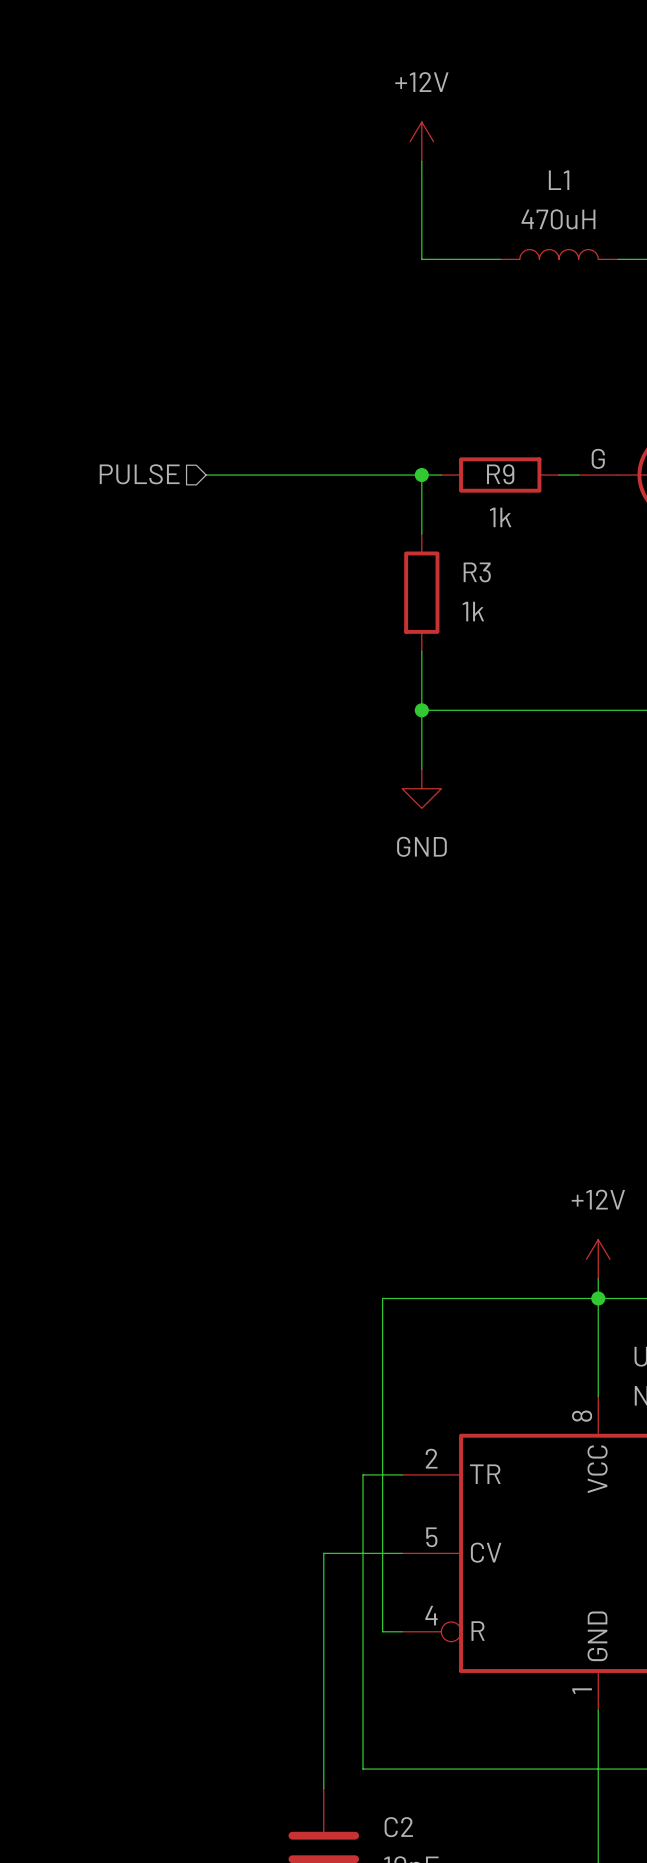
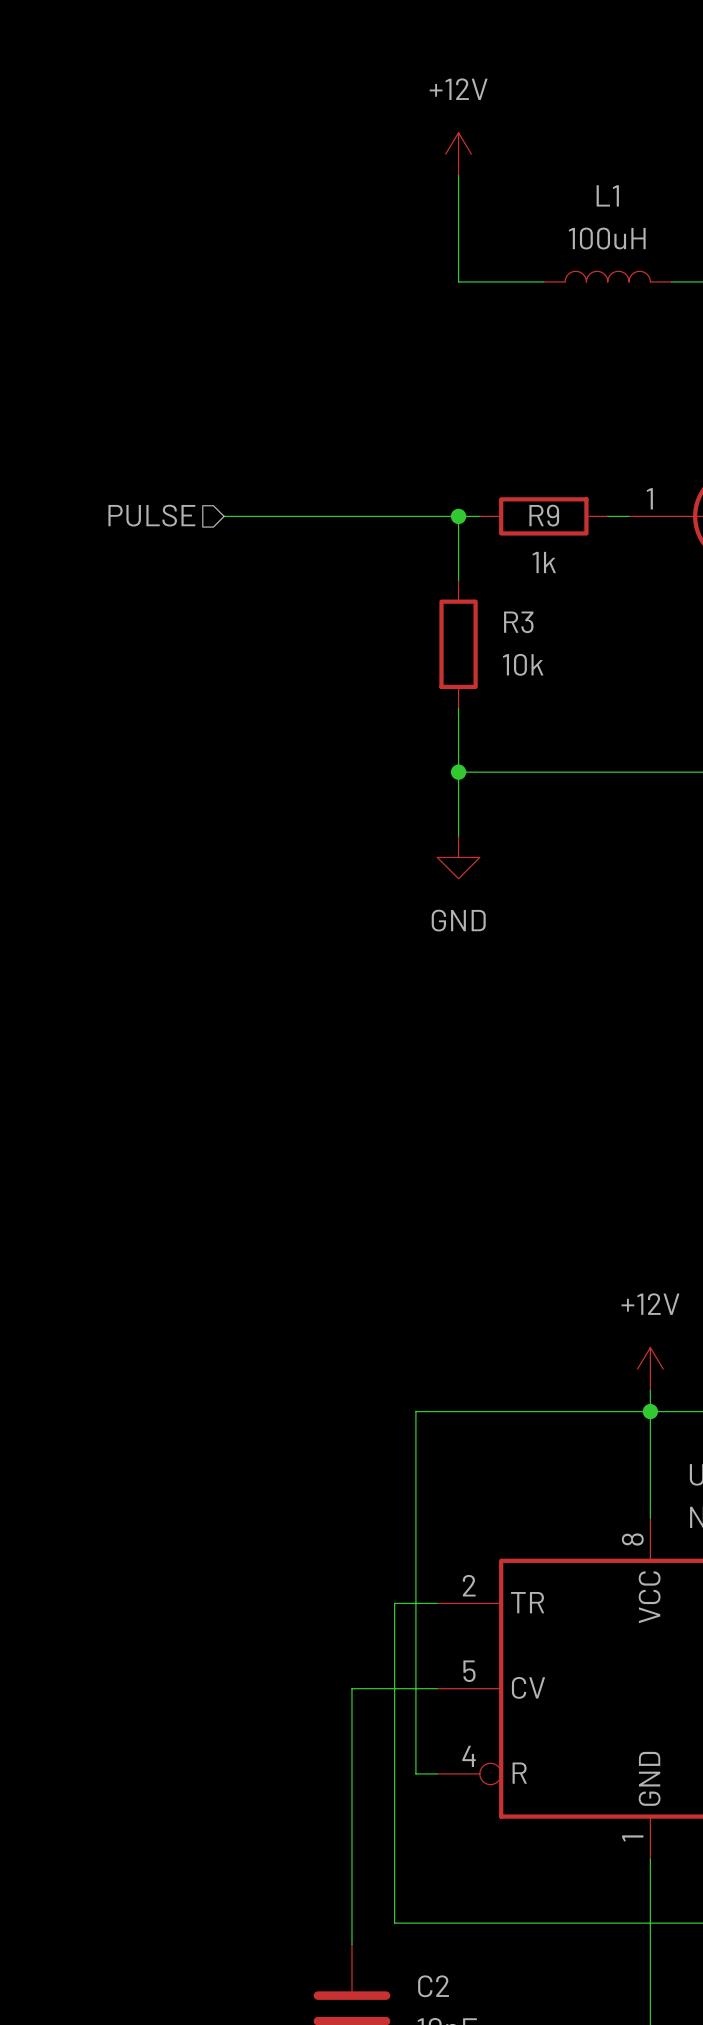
L1 value: 470uH (558, 219) -> 100uH (607, 238)
part pin number: none -> 1 (649, 498)
part pin name: G (598, 458) -> none
R3 value: 1k (473, 611) -> 10k (523, 664)

